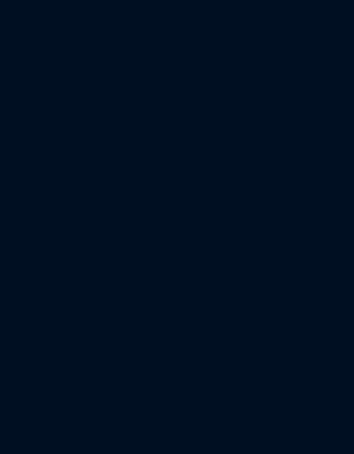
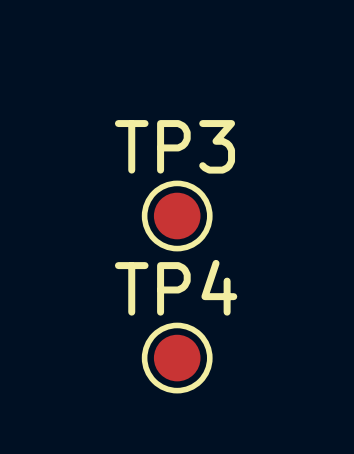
TP3: none -> (177, 216)
TP4: none -> (177, 358)

